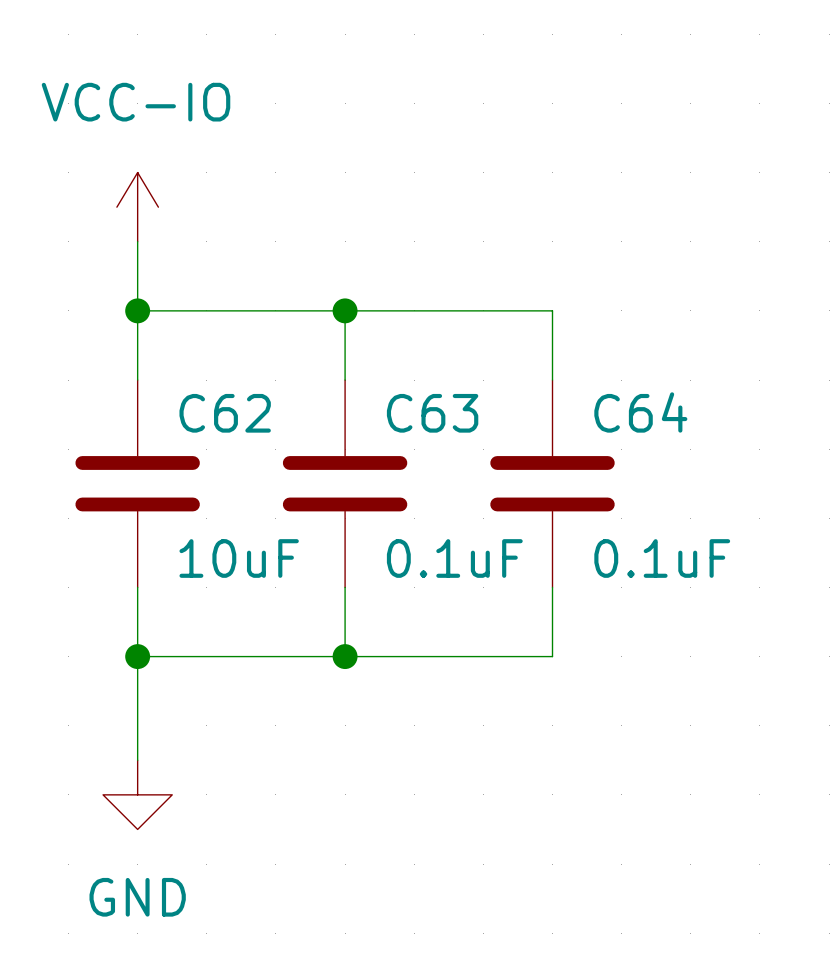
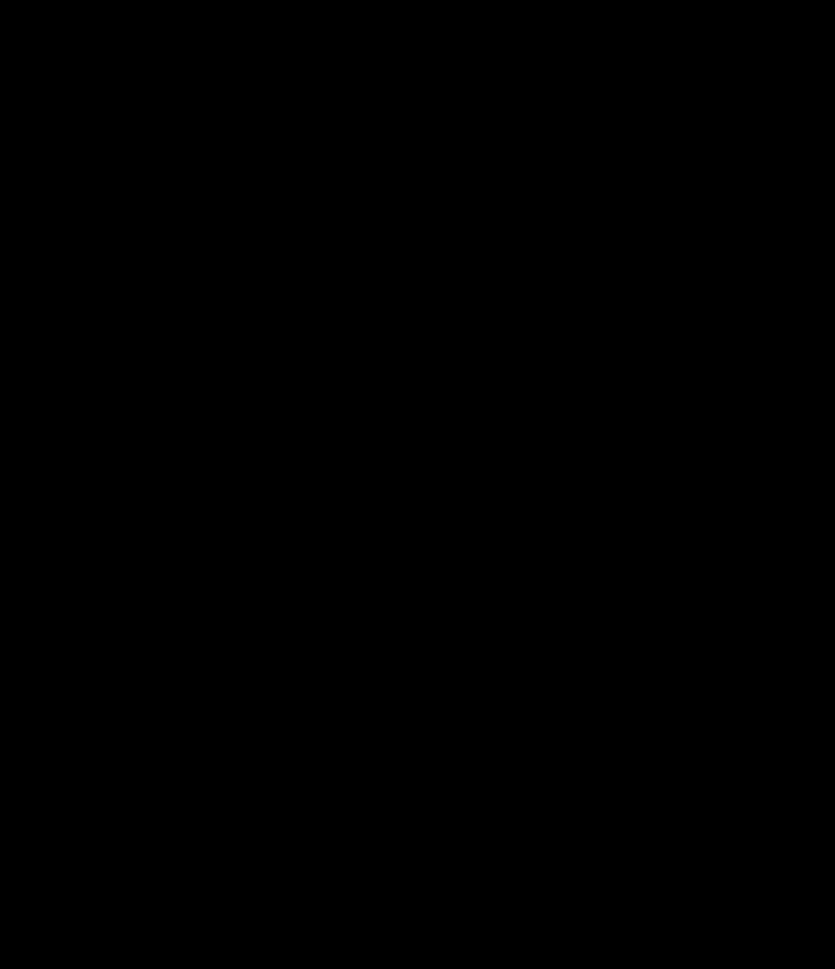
power symbol: VCC-IO (137, 207) -> none
wire: (137, 241) (137, 380) -> none
wire: (137, 310) (552, 310) (552, 380) -> none
junction: (137, 310) -> none
wire: (345, 310) (345, 380) -> none
junction: (345, 310) -> none
C62: 10uF (137, 483) -> none
C63: 0.1uF (345, 483) -> none
C64: 0.1uF (552, 483) -> none
wire: (137, 587) (137, 760) -> none
wire: (345, 587) (345, 656) -> none
wire: (552, 587) (552, 656) (137, 656) -> none
junction: (137, 656) -> none
junction: (345, 656) -> none
power symbol: GND (137, 794) -> none

